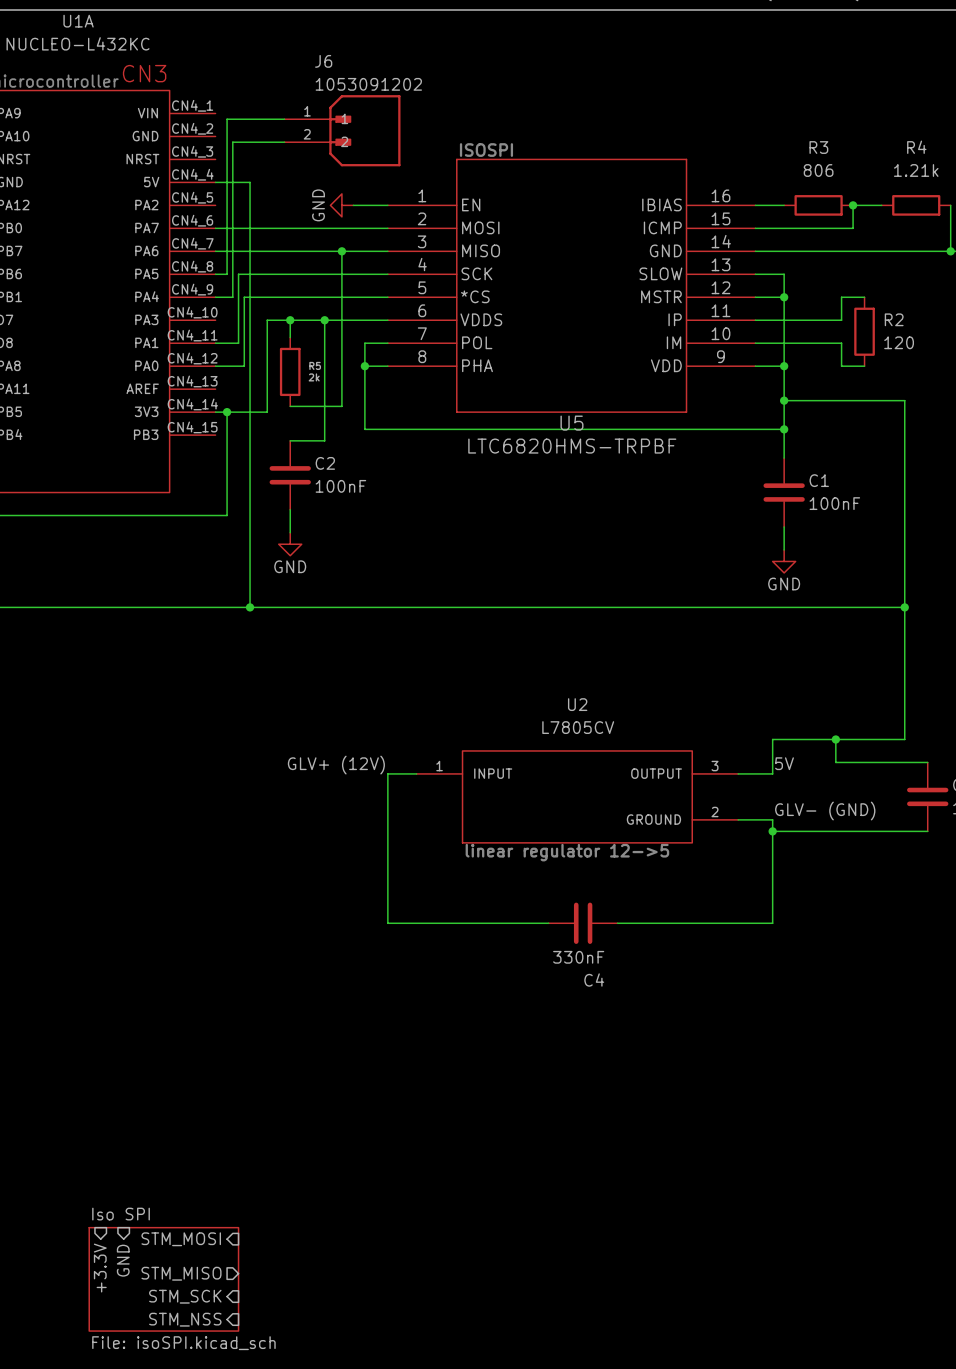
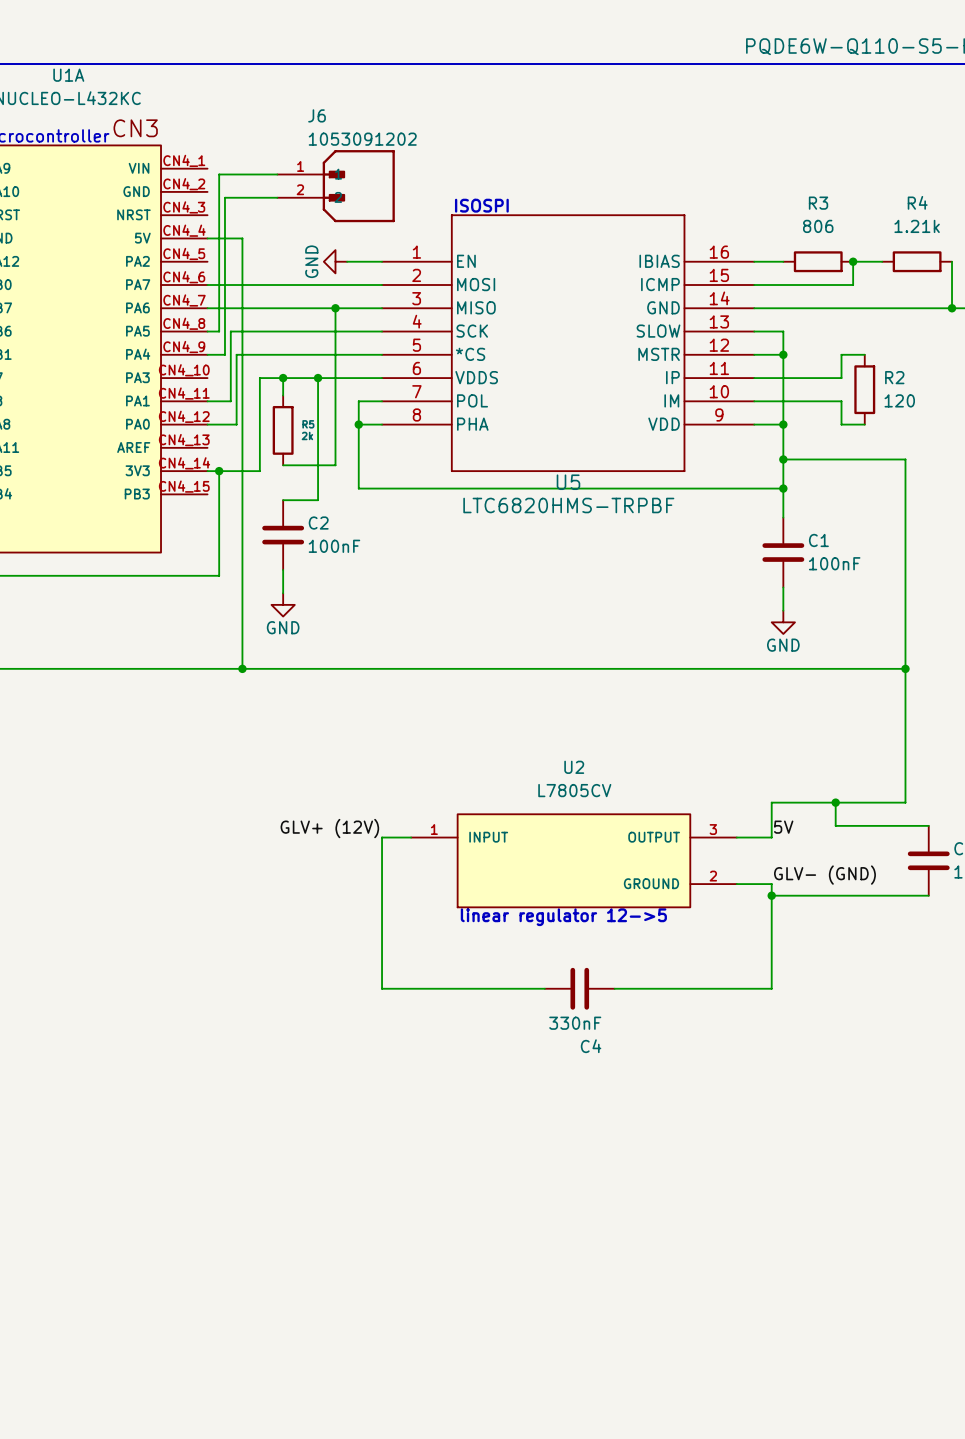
sheet pin: STM_MOSI (181, 1239) -> none
sheet pin: GND (123, 1260) -> none
sheet pin: +3.3V (100, 1268) -> none
sheet pin: STM_MISO (181, 1273) -> none
sheet Iso SPI: File: isoSPI.kicad_sch (163, 1279) -> none
sheet pin: STM_SCK (185, 1296) -> none
sheet pin: STM_NSS (185, 1319) -> none

